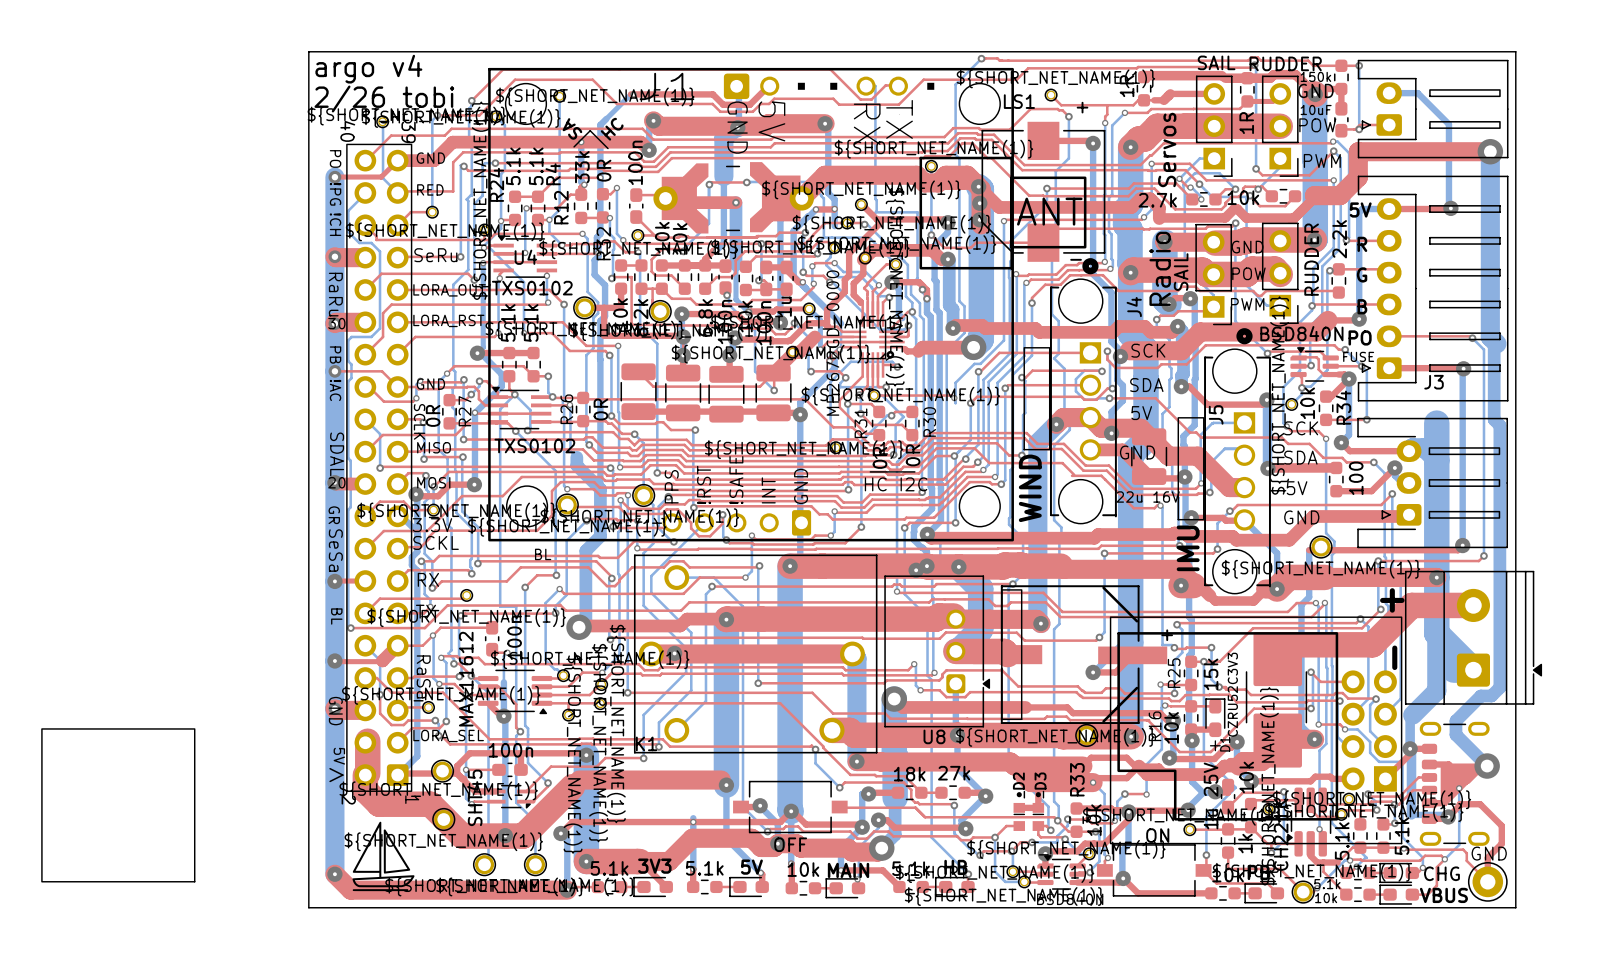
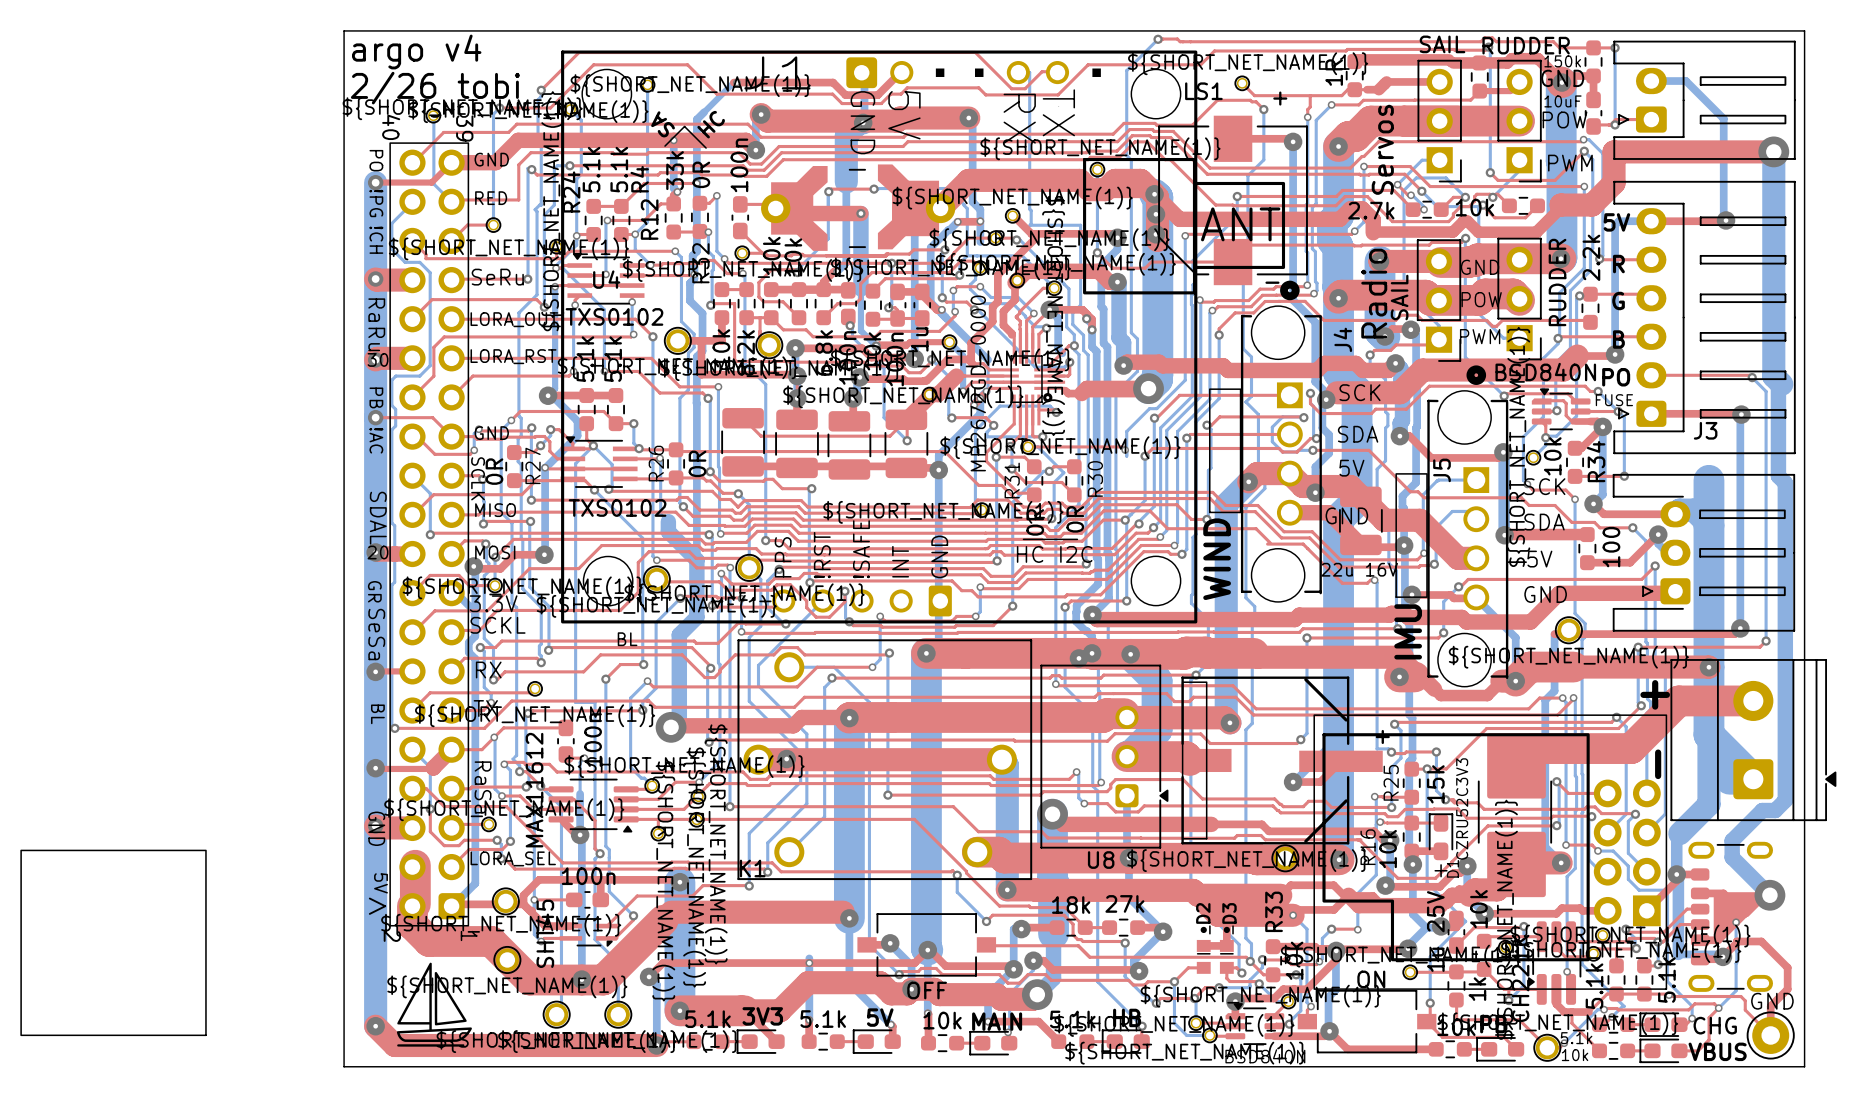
part value: 1R (1246, 123) -> none

